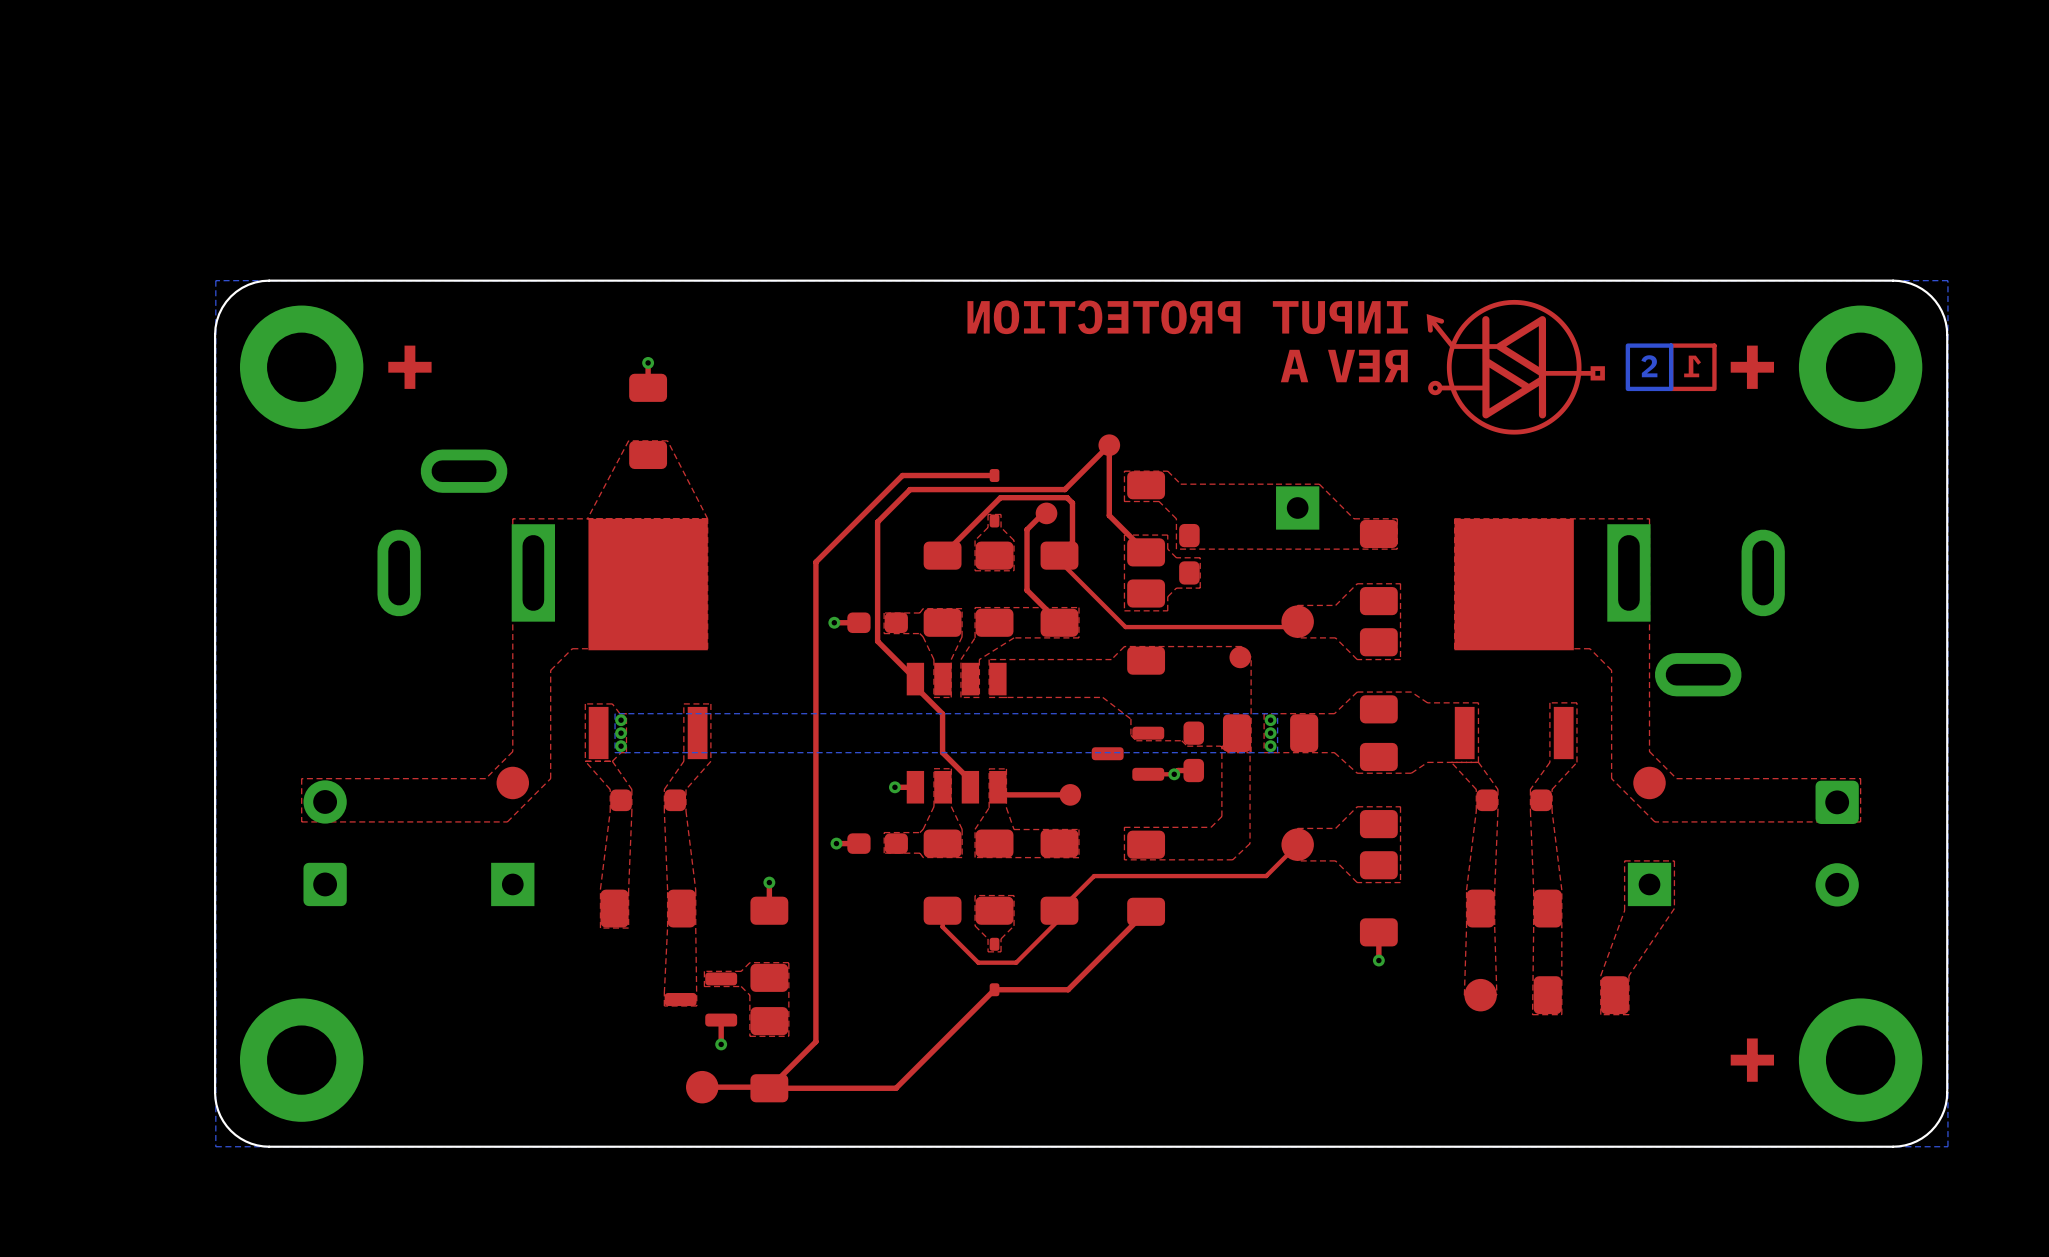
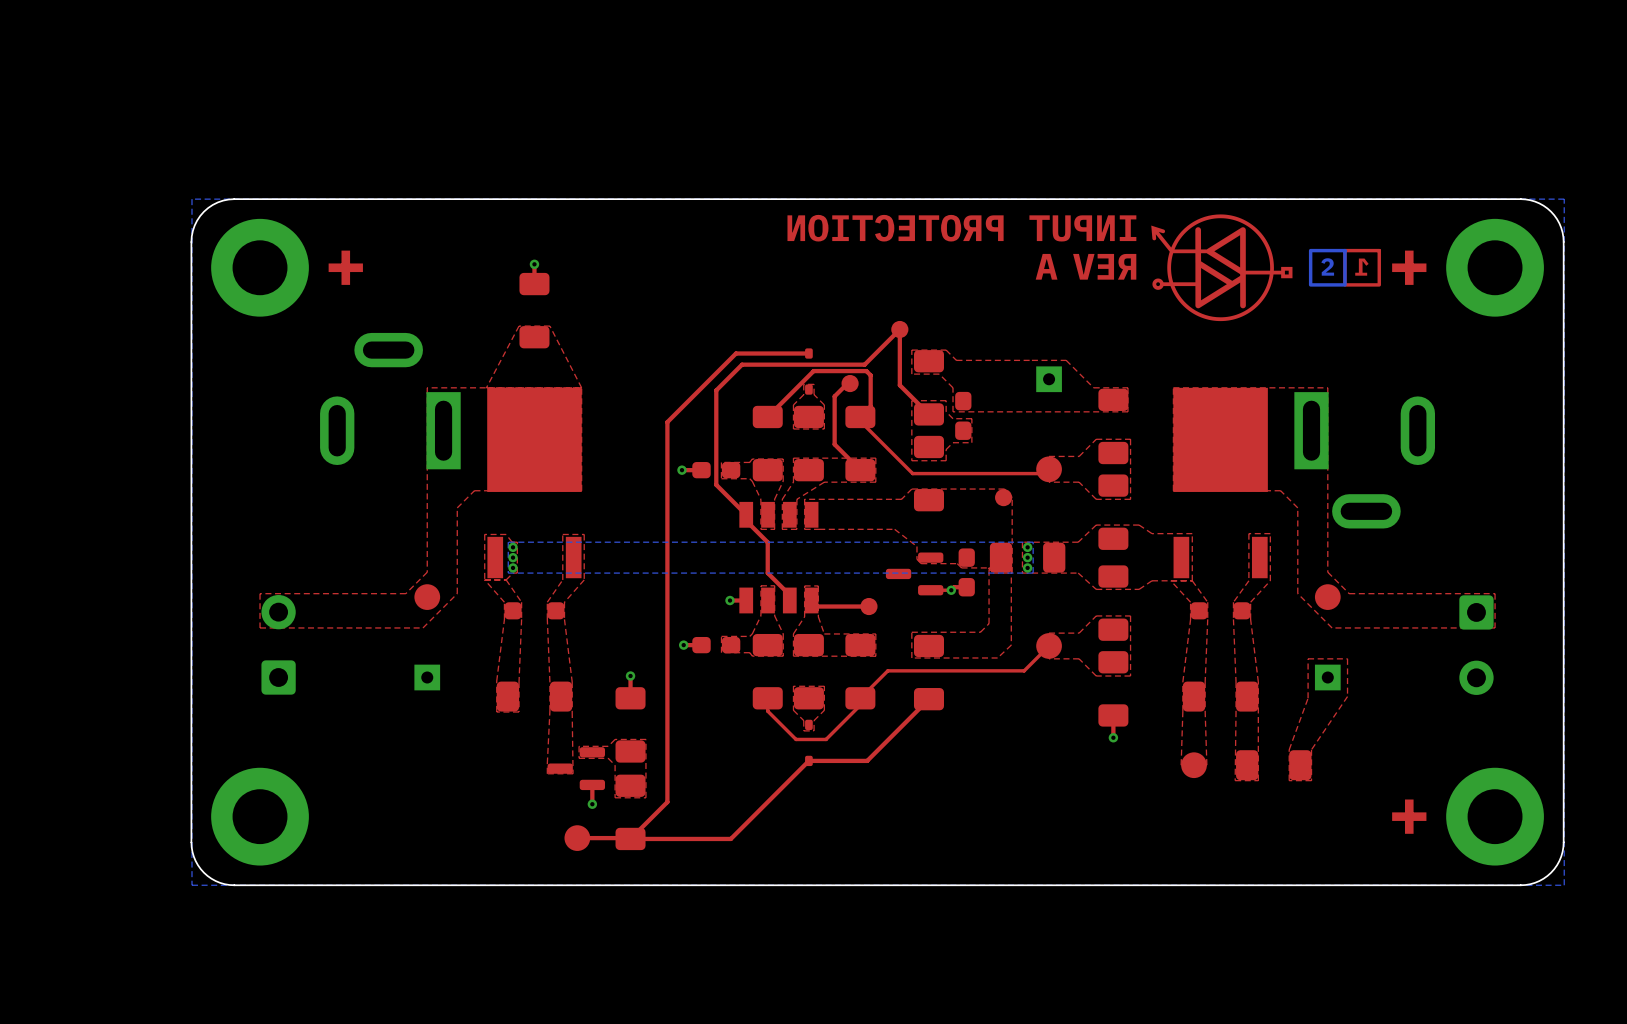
part footprint: [1276, 486, 1320, 530] -> [1036, 366, 1062, 393]
part footprint: [491, 862, 535, 907] -> [414, 664, 441, 691]
part footprint: [1627, 862, 1672, 907] -> [1314, 664, 1341, 691]

